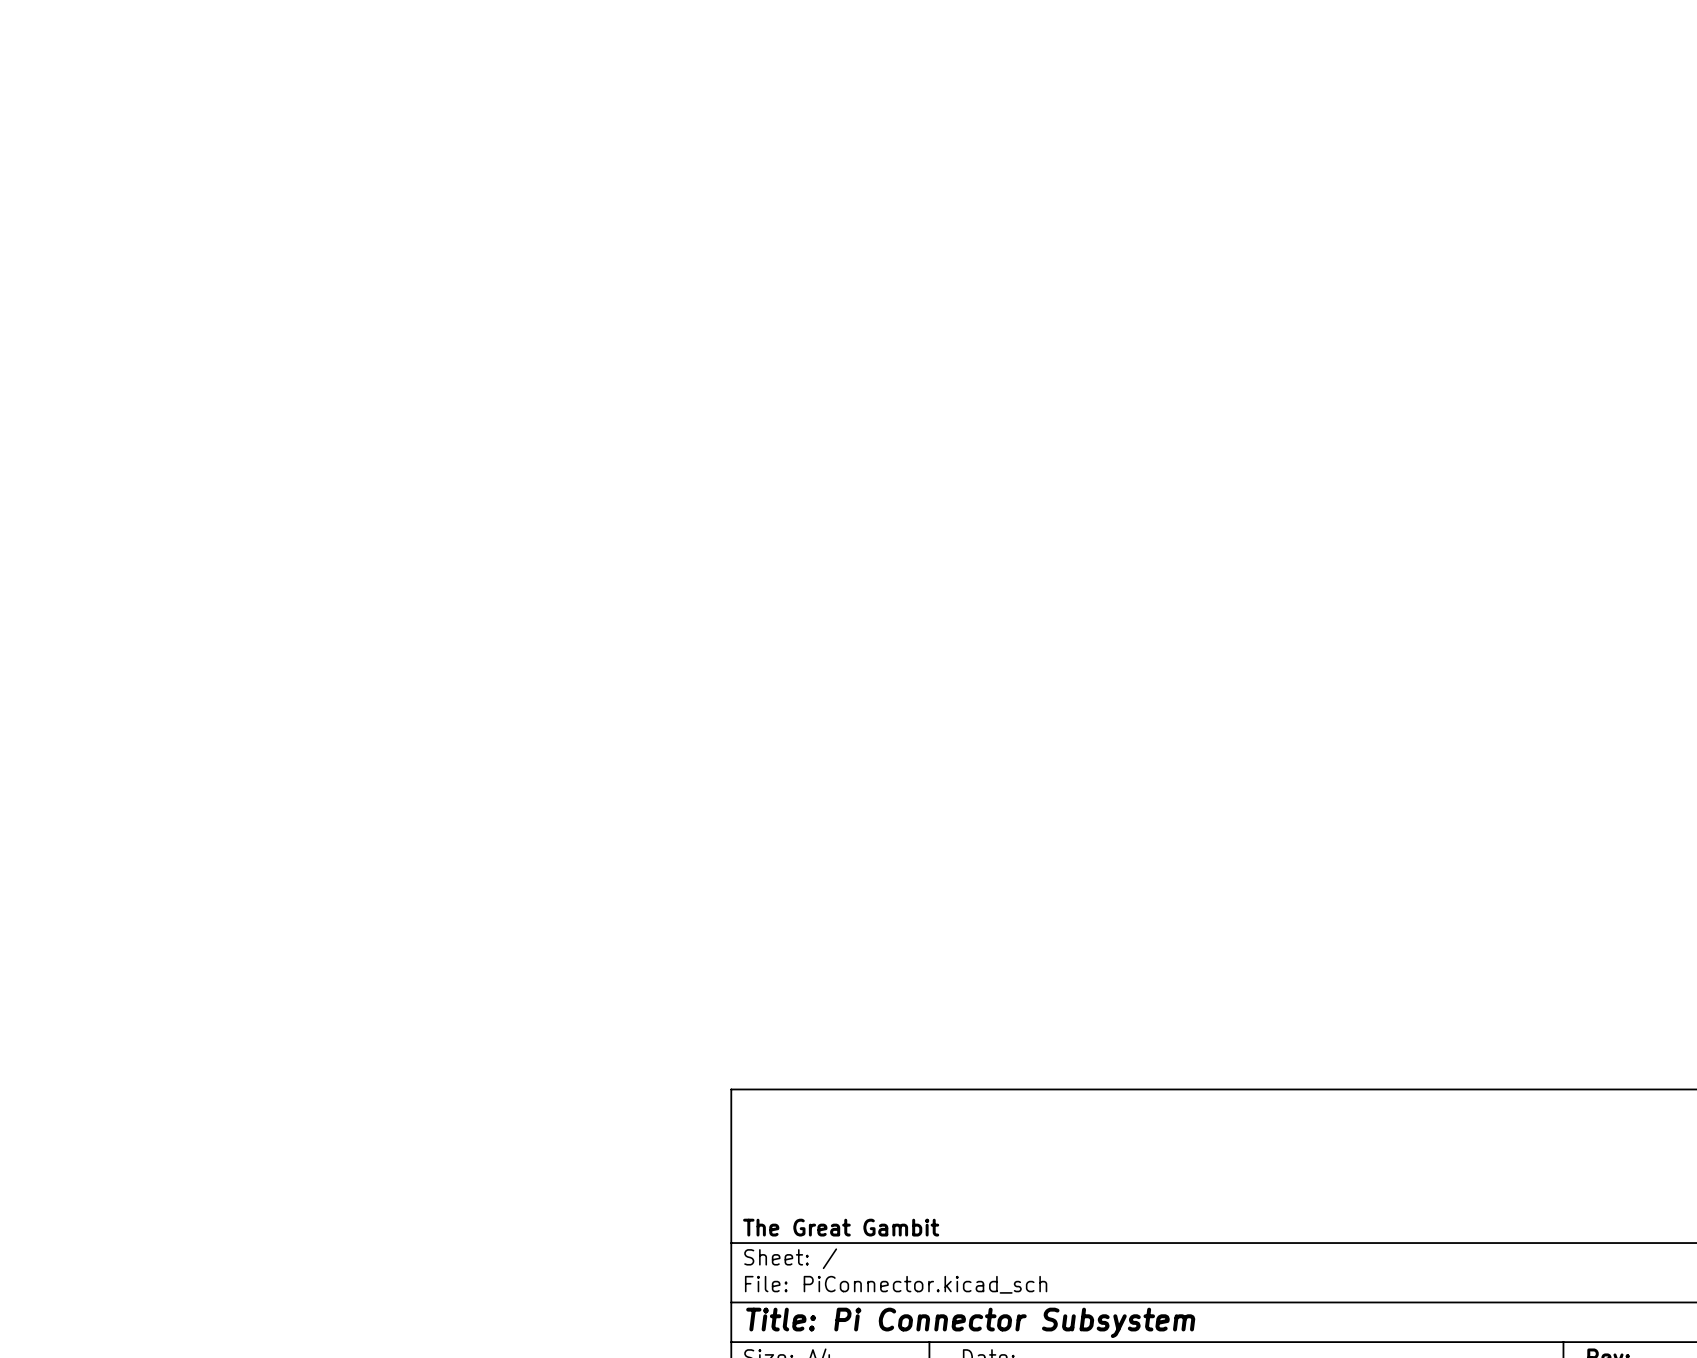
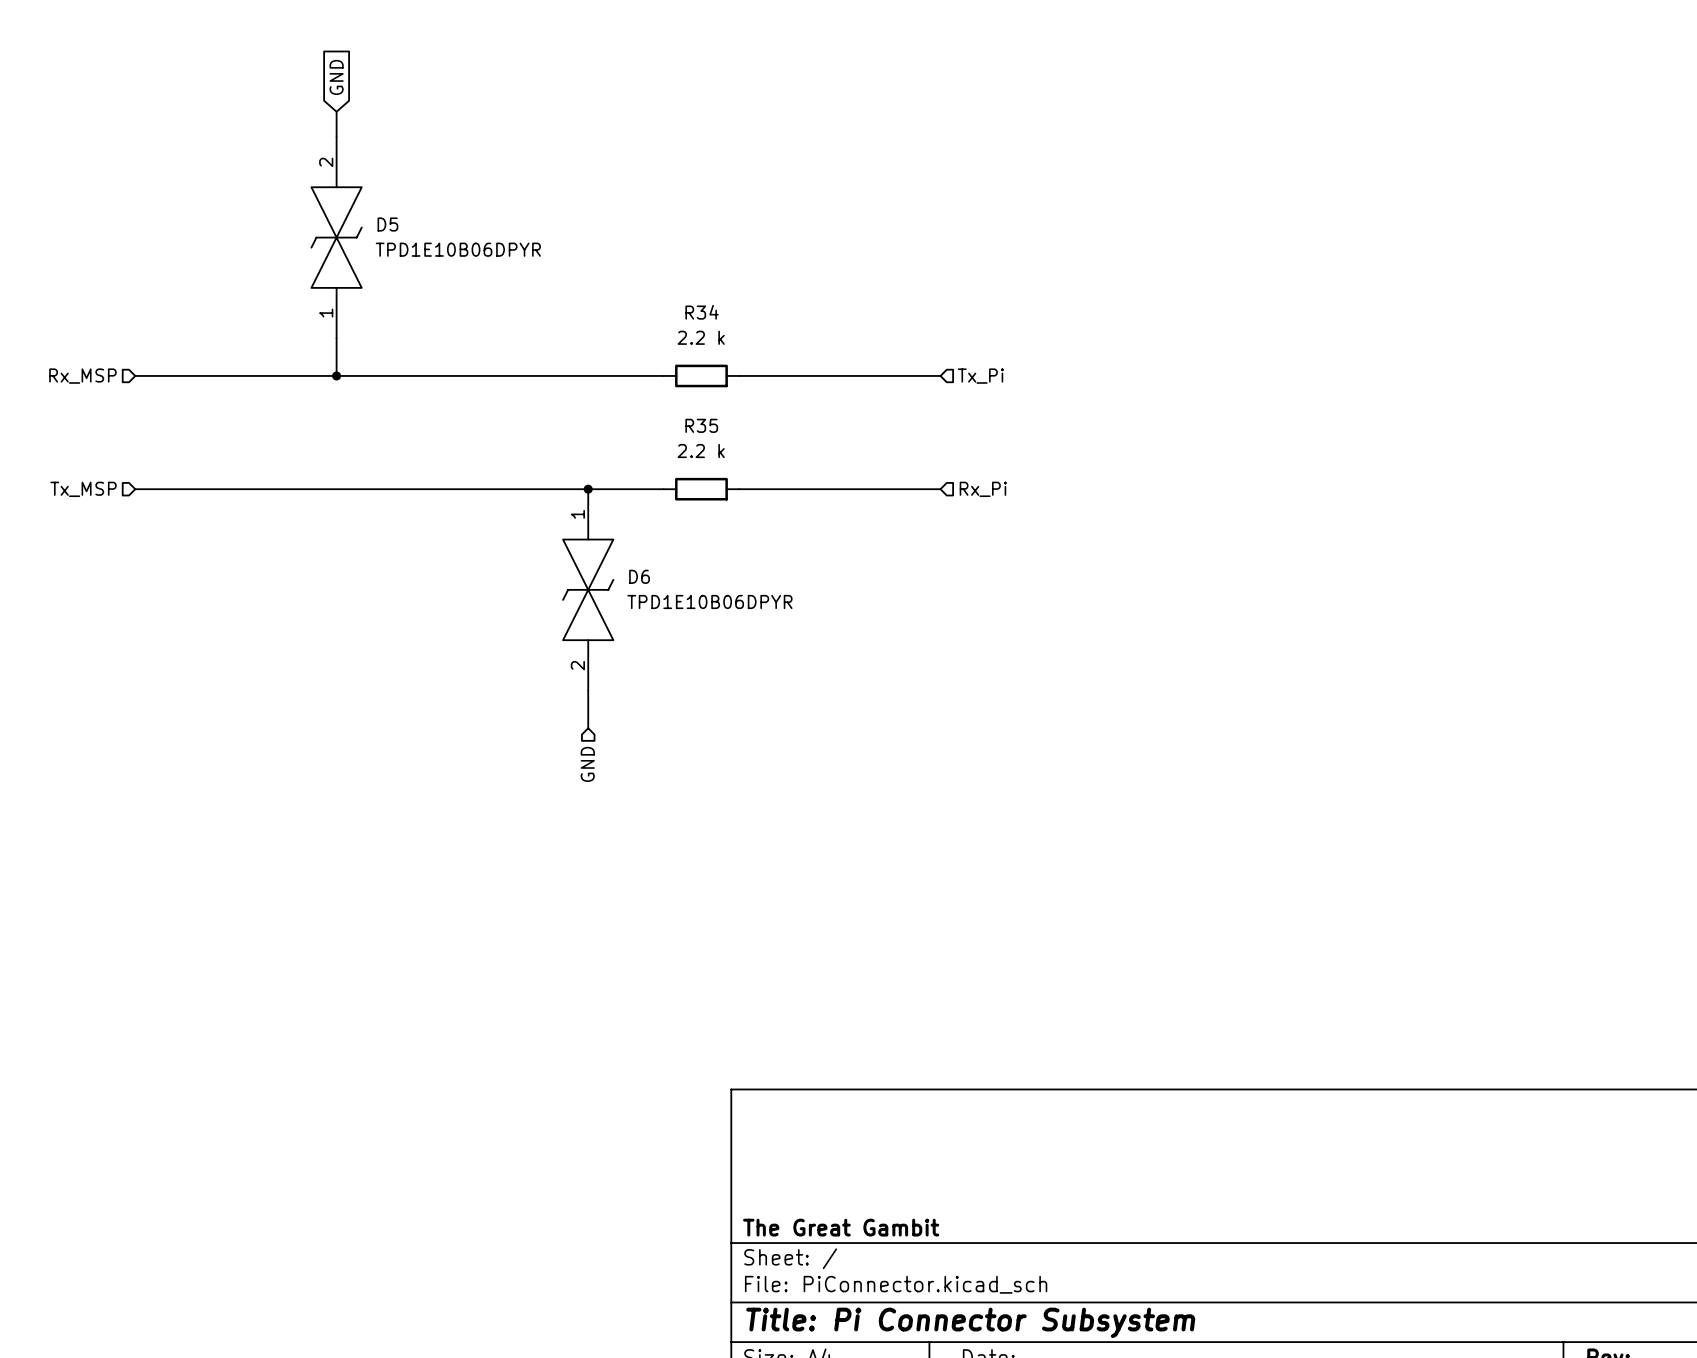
global label: none -> GND (336, 77)
wire: none -> (336, 111) (336, 136)
D5: none -> TPD1E10B06DPYR (336, 237)
wire: none -> (336, 338) (336, 375)
wire: none -> (135, 375) (663, 375)
junction: none -> (336, 375)
R34: none -> 2.2 k (701, 375)
wire: none -> (739, 375) (940, 375)
hierarchical label: none -> Rx_MSP (82, 376)
hierarchical label: none -> Tx_Pi (980, 376)
hierarchical label: none -> Tx_MSP (83, 489)
wire: none -> (135, 489) (663, 489)
junction: none -> (588, 489)
R35: none -> 2.2 k (701, 489)
wire: none -> (739, 489) (940, 489)
hierarchical label: none -> Rx_Pi (983, 489)
D6: none -> TPD1E10B06DPYR (588, 589)
wire: none -> (588, 690) (588, 728)
hierarchical label: none -> GND (587, 764)

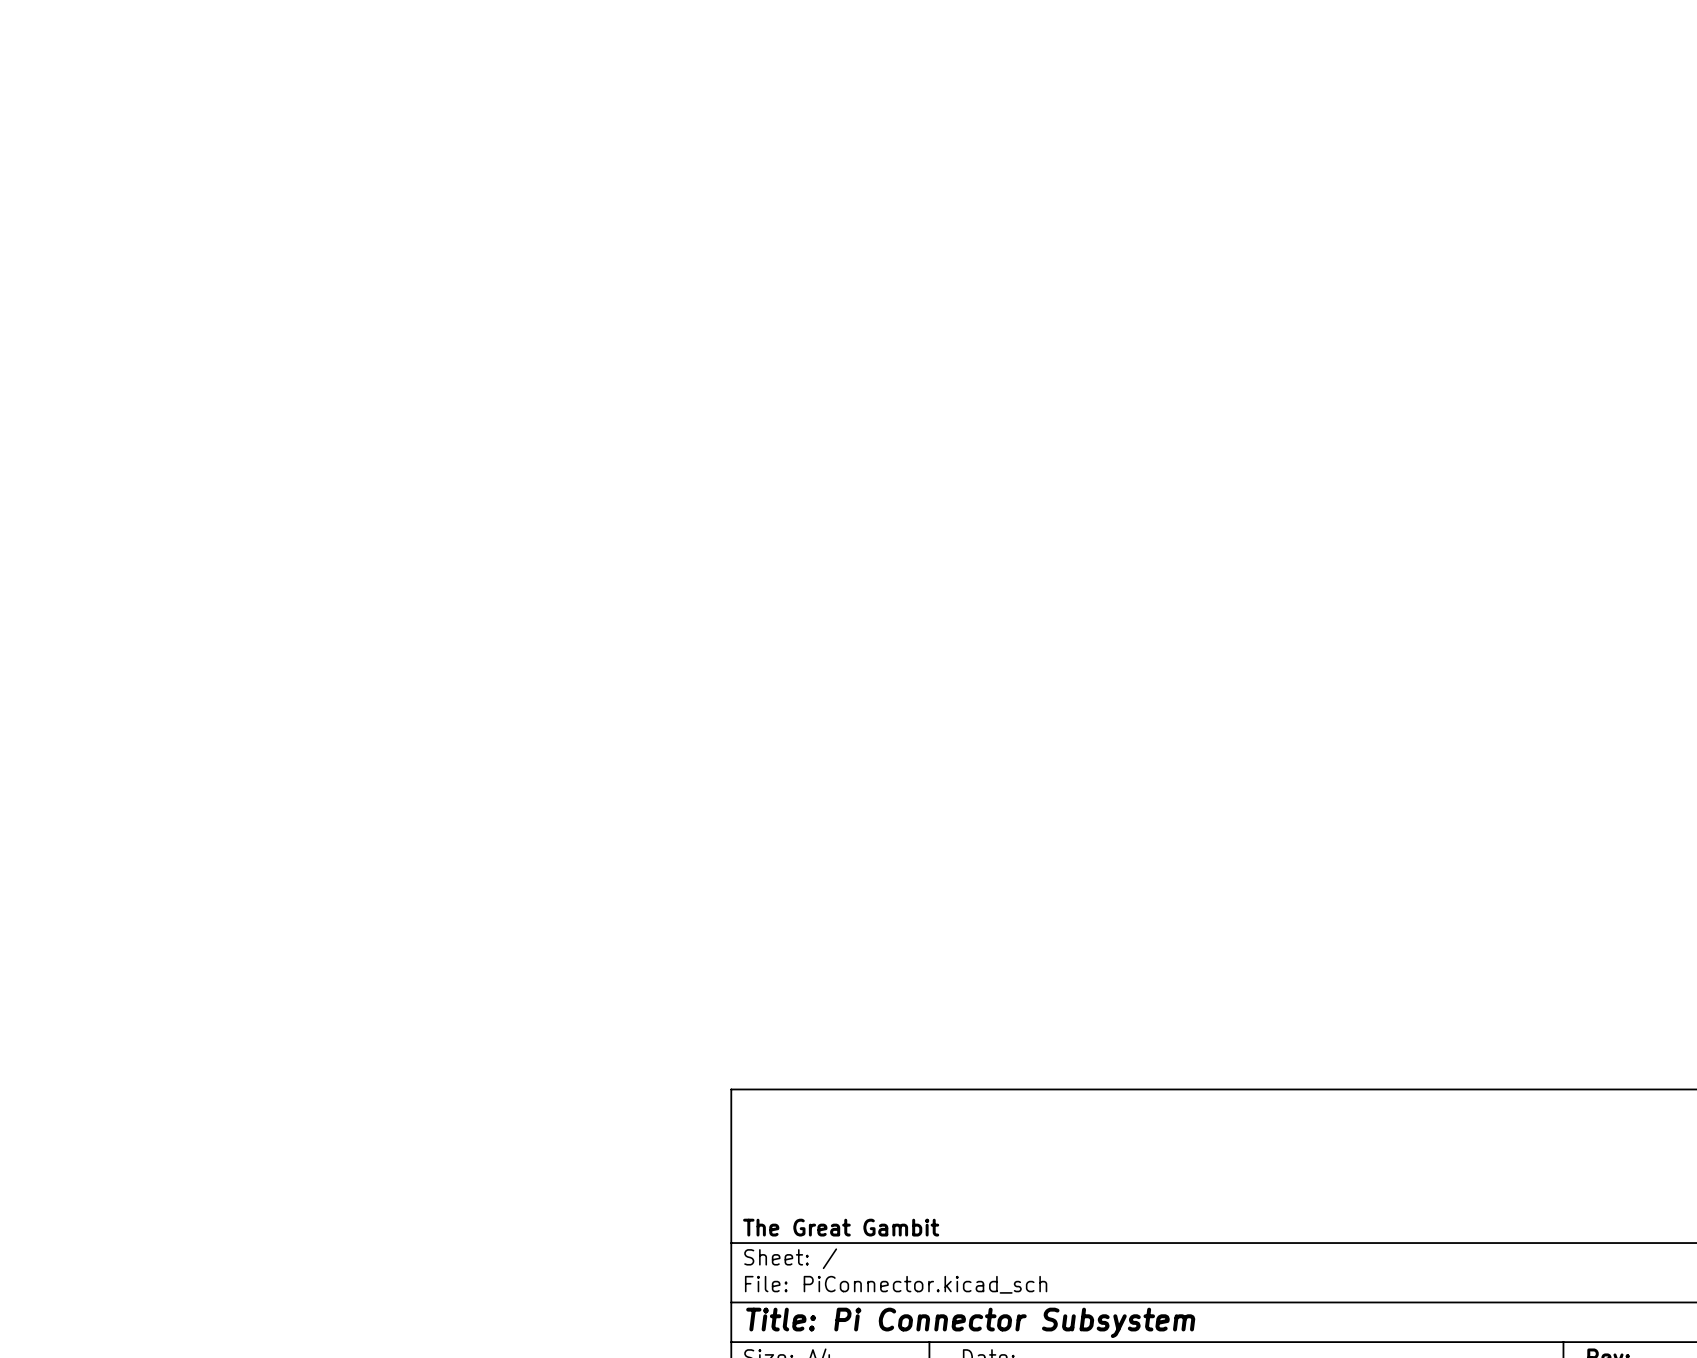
global label: GND (336, 77) -> none
wire: (336, 111) (336, 136) -> none
D5: TPD1E10B06DPYR (336, 237) -> none
wire: (336, 338) (336, 375) -> none
wire: (135, 375) (663, 375) -> none
junction: (336, 375) -> none
R34: 2.2 k (701, 375) -> none
wire: (739, 375) (940, 375) -> none
hierarchical label: Rx_MSP (82, 376) -> none
hierarchical label: Tx_Pi (980, 376) -> none
hierarchical label: Tx_MSP (83, 489) -> none
wire: (135, 489) (663, 489) -> none
junction: (588, 489) -> none
R35: 2.2 k (701, 489) -> none
wire: (739, 489) (940, 489) -> none
hierarchical label: Rx_Pi (983, 489) -> none
D6: TPD1E10B06DPYR (588, 589) -> none
wire: (588, 690) (588, 728) -> none
hierarchical label: GND (587, 764) -> none

